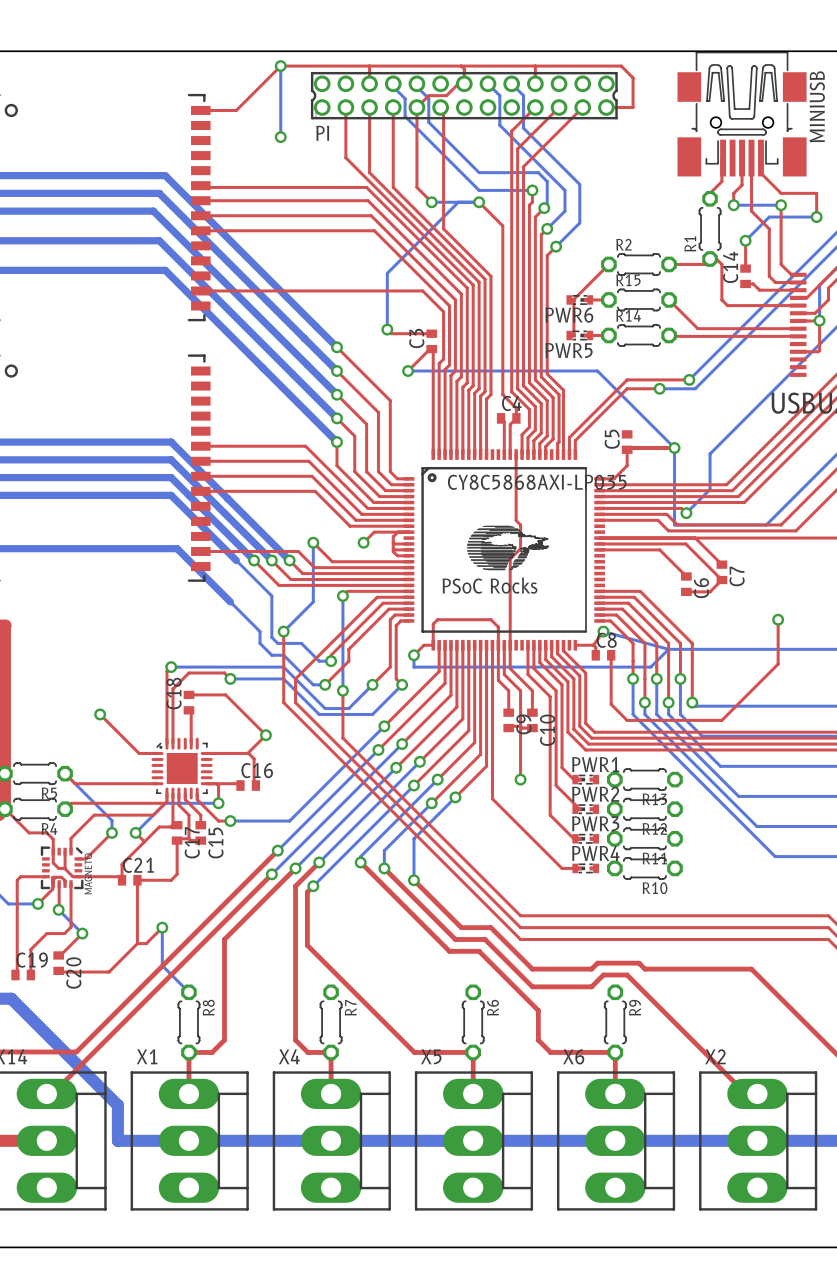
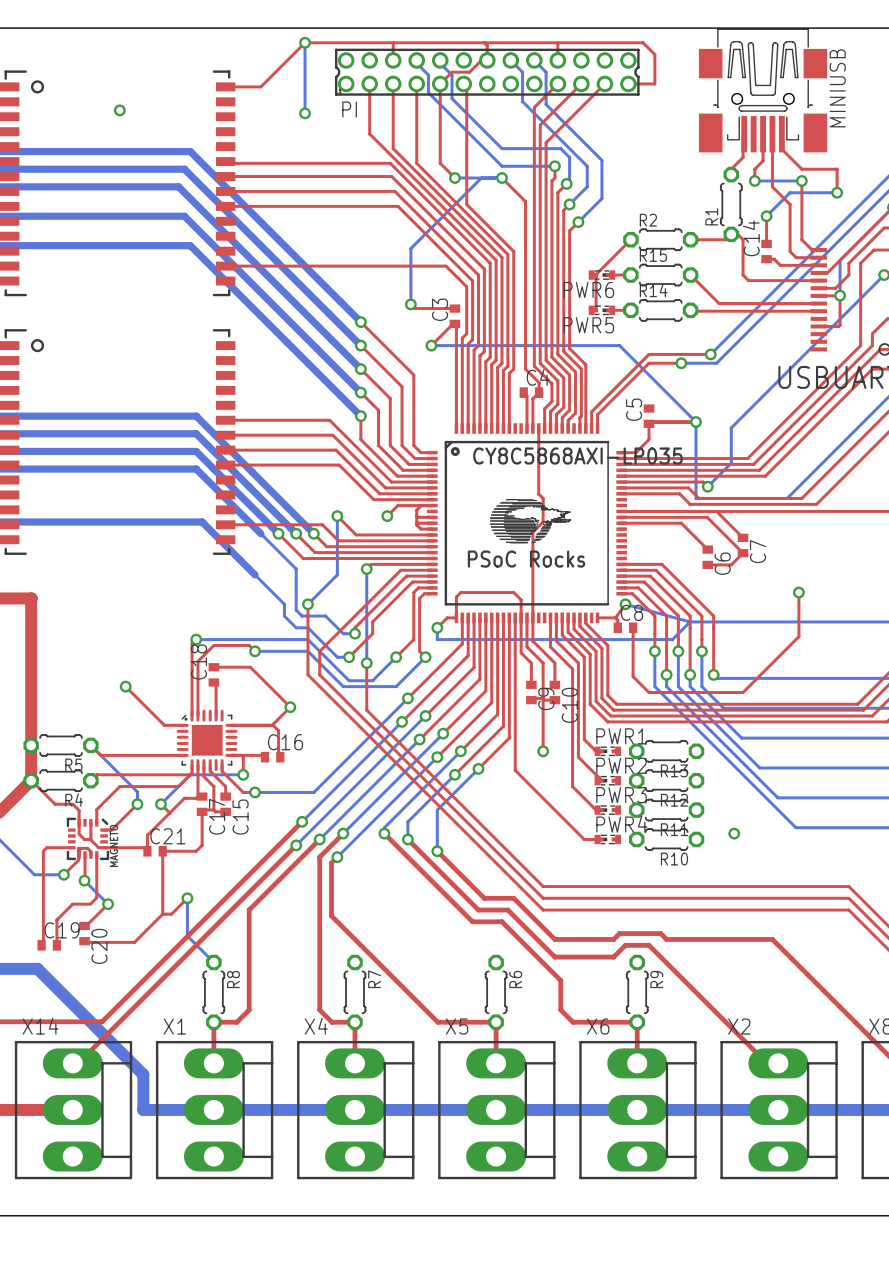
via: none -> (119, 110)
via: none -> (734, 833)

